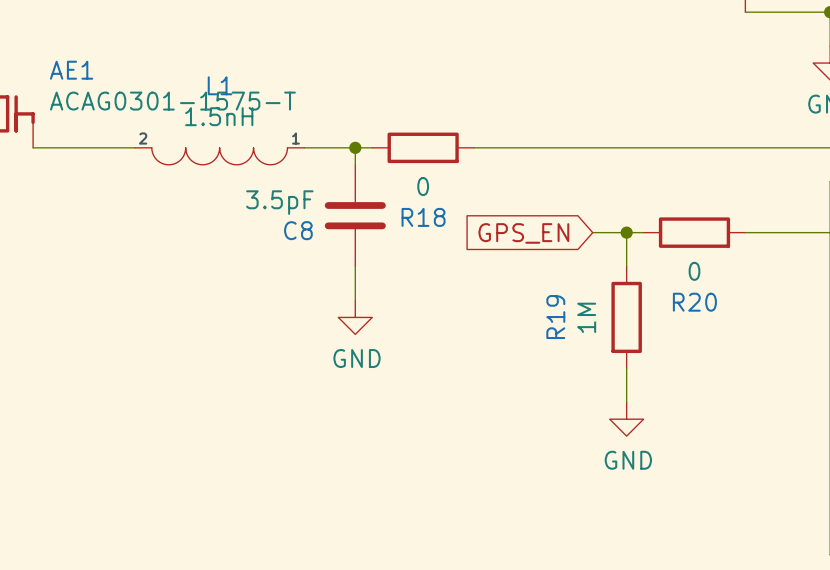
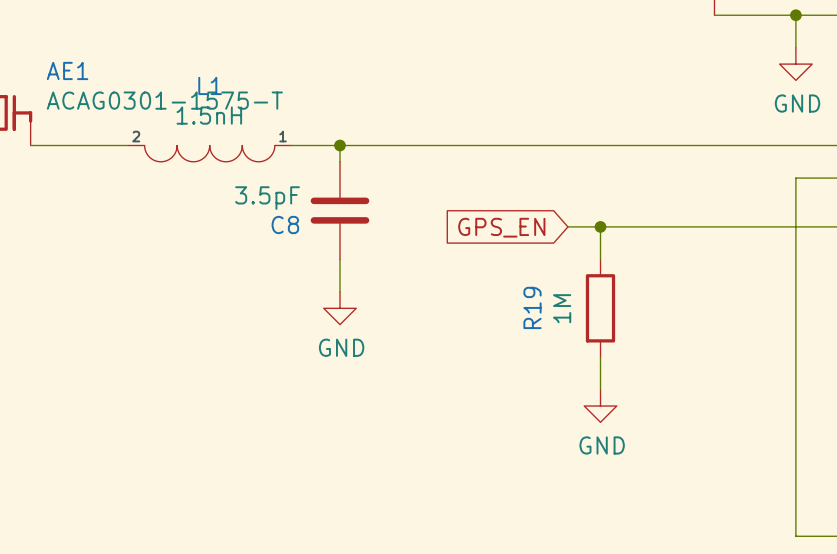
wire: none -> (356, 145) (453, 145)
R18: 0 (423, 147) -> none
wire: none -> (616, 226) (714, 226)
R20: 0 (694, 232) -> none

